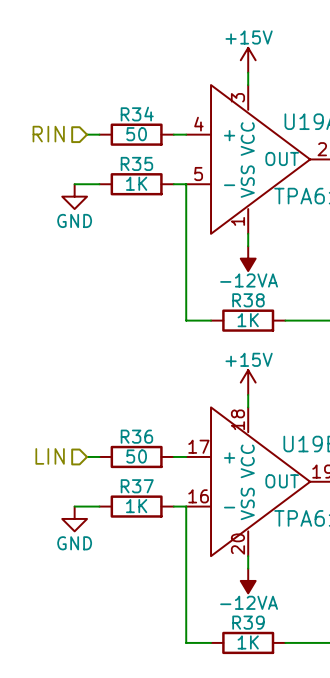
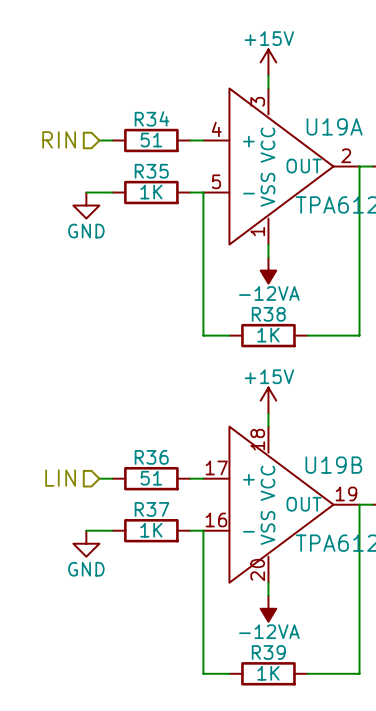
R34 value: 50 (136, 134) -> 51 (151, 140)
R36 value: 50 (136, 456) -> 51 (151, 478)

